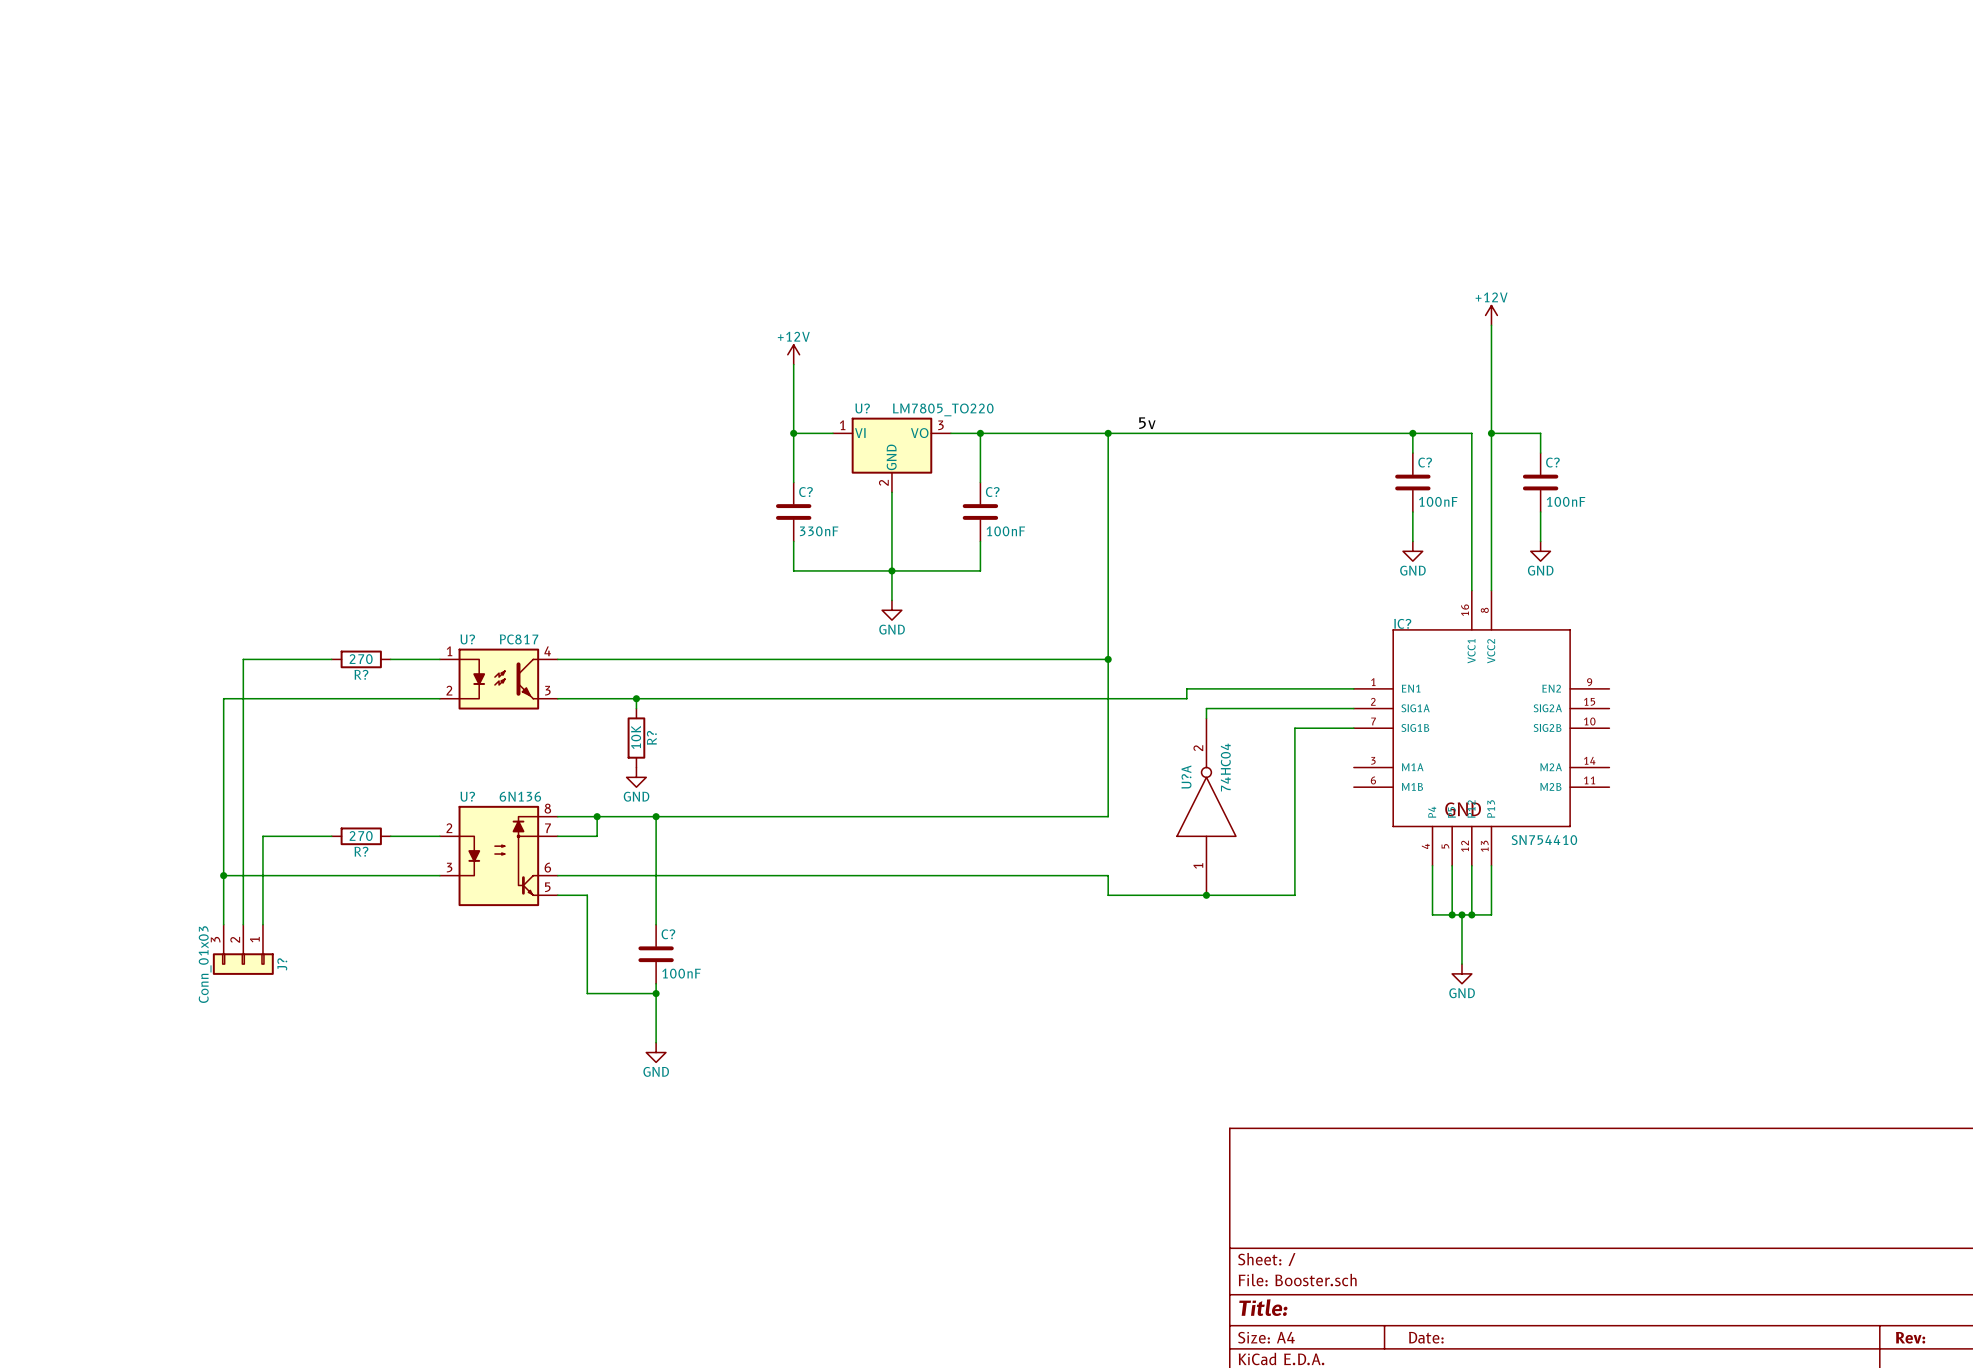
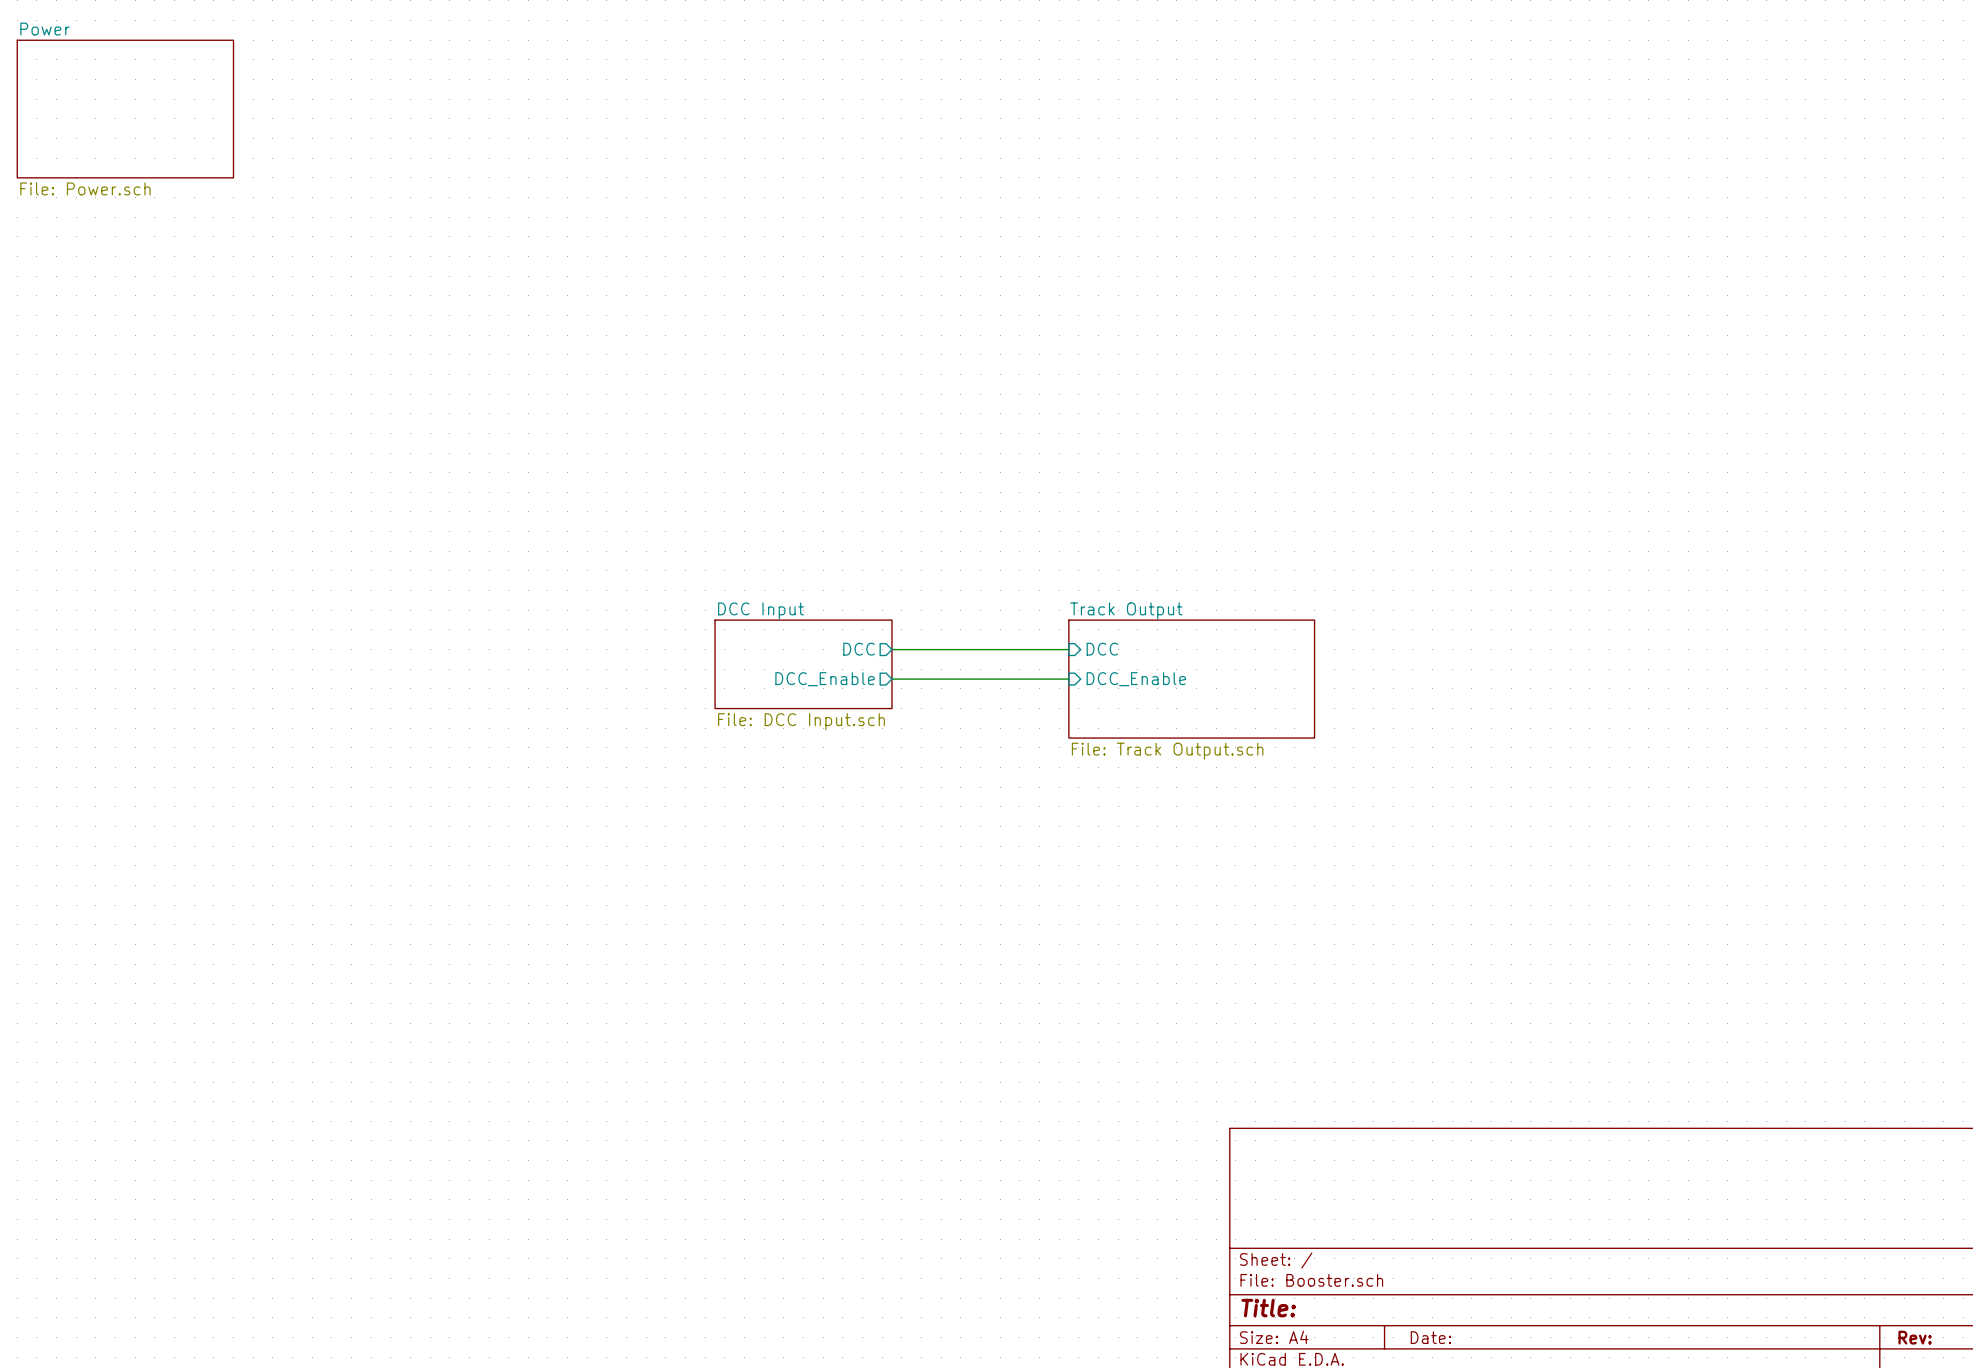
sheet Power: none -> File: Power.sch (125, 109)
power symbol: +12V (1491, 315) -> none
wire: (1491, 325) (1491, 590) -> none
power symbol: +12V (793, 354) -> none
wire: (793, 364) (793, 482) -> none
label: 5v (1147, 423) -> none
wire: (793, 433) (833, 433) -> none
junction: (793, 433) -> none
wire: (950, 433) (1471, 433) (1471, 590) -> none
wire: (980, 433) (980, 482) -> none
junction: (980, 433) -> none
wire: (1108, 433) (1108, 816) (557, 816) -> none
junction: (1108, 433) -> none
wire: (1412, 433) (1412, 453) -> none
junction: (1412, 433) -> none
wire: (1491, 433) (1540, 433) (1540, 453) -> none
junction: (1491, 433) -> none
U?: LM7805_TO220 (891, 454) -> none
C?: 100nF (1412, 482) -> none
C?: 100nF (1540, 482) -> none
wire: (891, 492) (891, 600) -> none
C?: 330nF (793, 511) -> none
C?: 100nF (980, 511) -> none
wire: (1412, 511) (1412, 541) -> none
wire: (1540, 511) (1540, 541) -> none
wire: (793, 541) (793, 570) (980, 570) (980, 541) -> none
power symbol: GND (1412, 551) -> none
power symbol: GND (1540, 551) -> none
junction: (891, 570) -> none
power symbol: GND (891, 610) -> none
sheet pin: none -> DCC (859, 649)
wire: none -> (891, 649) (1068, 649)
sheet pin: none -> DCC (1102, 649)
wire: (331, 659) (243, 659) (243, 924) -> none
R?: 270 (361, 659) -> none
wire: (390, 659) (439, 659) -> none
wire: (557, 659) (1108, 659) -> none
junction: (1108, 659) -> none
sheet DCC Input: none -> File: DCC Input.sch (803, 664)
U?: PC817 (498, 679) -> none
wire: none -> (891, 679) (1068, 679)
sheet Track Output: none -> File: Track Output.sch (1191, 679)
sheet pin: none -> DCC_Enable (825, 679)
sheet pin: none -> DCC_Enable (1136, 679)
wire: (1353, 688) (1186, 688) (1186, 698) (557, 698) -> none
wire: (439, 698) (223, 698) (223, 924) -> none
wire: (636, 698) (636, 708) -> none
junction: (636, 698) -> none
wire: (1353, 708) (1206, 708) (1206, 718) -> none
wire: (1353, 728) (1294, 728) (1294, 895) (1108, 895) (1108, 875) (557, 875) -> none
IC?: SN754410 (1481, 728) -> none
R?: 10K (636, 738) -> none
power symbol: GND (636, 777) -> none
U?A: 74HC04 (1206, 806) -> none
wire: (597, 816) (597, 836) (557, 836) -> none
junction: (597, 816) -> none
wire: (656, 816) (656, 924) -> none
junction: (656, 816) -> none
wire: (331, 836) (262, 836) (262, 924) -> none
R?: 270 (361, 836) -> none
wire: (390, 836) (439, 836) -> none
U?: 6N136 (498, 855) -> none
wire: (1432, 865) (1432, 914) (1491, 914) (1491, 865) -> none
wire: (1452, 865) (1452, 914) -> none
wire: (1471, 865) (1471, 914) -> none
wire: (223, 875) (439, 875) -> none
junction: (223, 875) -> none
wire: (557, 895) (587, 895) (587, 993) (656, 993) -> none
junction: (1206, 895) -> none
junction: (1452, 914) -> none
wire: (1461, 914) (1461, 964) -> none
junction: (1461, 914) -> none
junction: (1471, 914) -> none
J?: Conn_01x03 (243, 949) -> none
C?: 100nF (656, 954) -> none
power symbol: GND (1461, 973) -> none
wire: (656, 983) (656, 1042) -> none
junction: (656, 993) -> none
power symbol: GND (656, 1052) -> none

